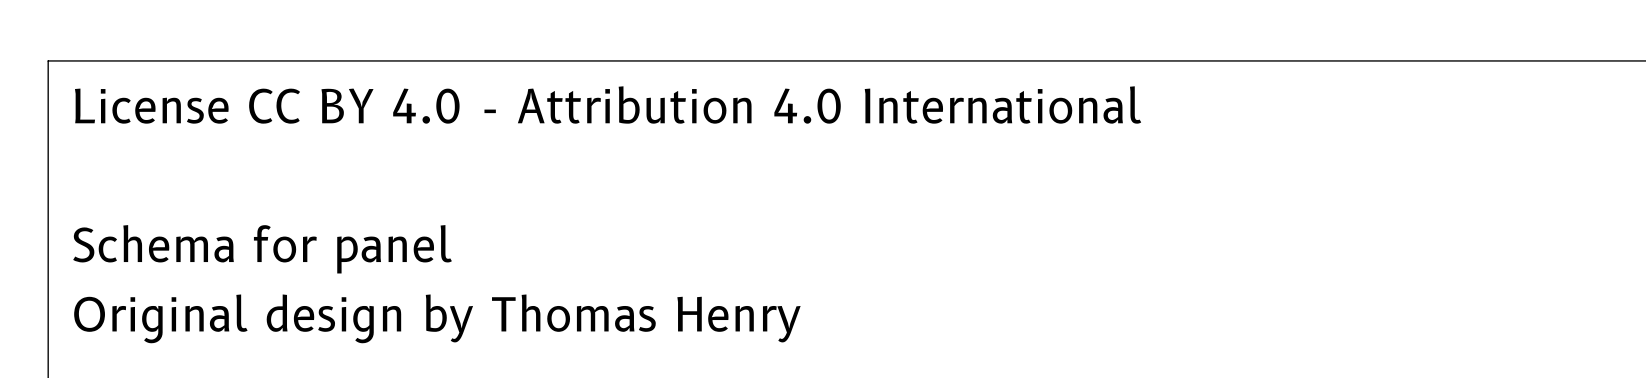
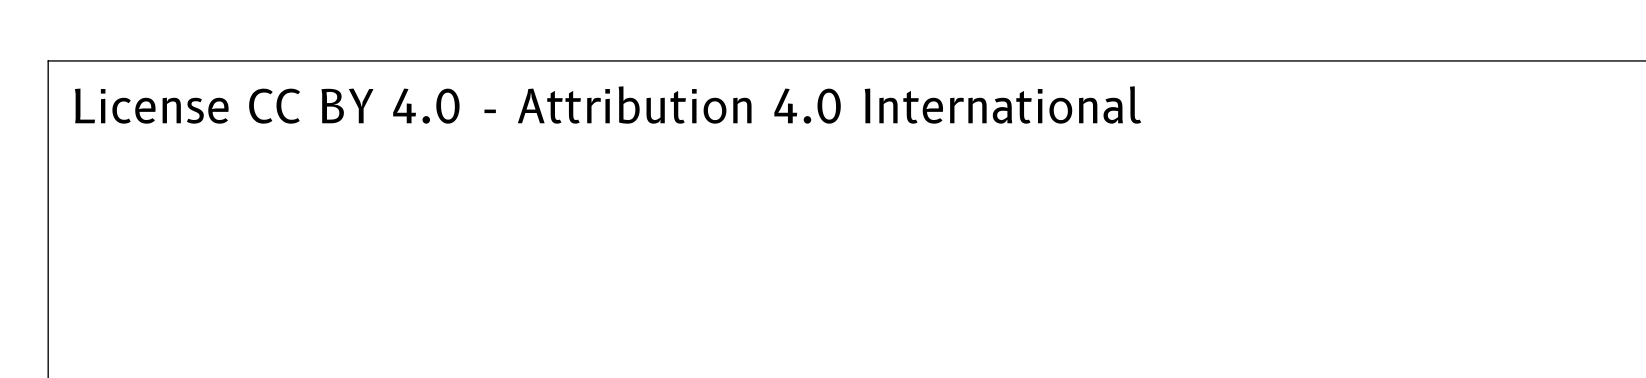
title block: Schema for panel (262, 249) -> none
title block: Original design by Thomas Henry (437, 318) -> none

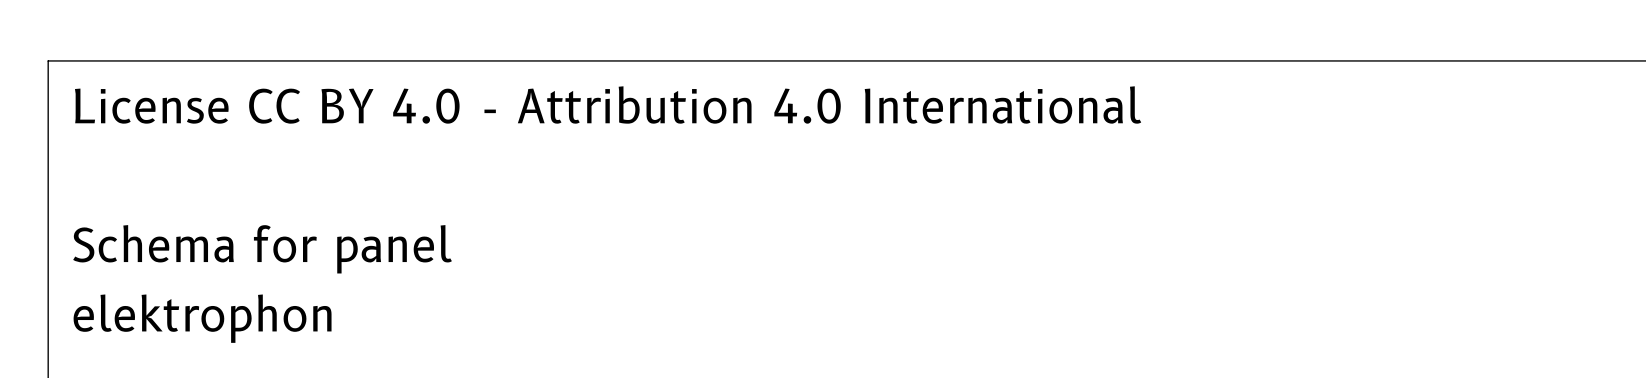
title block: none -> Schema for panel (262, 249)
title block: none -> elektrophon (202, 318)

